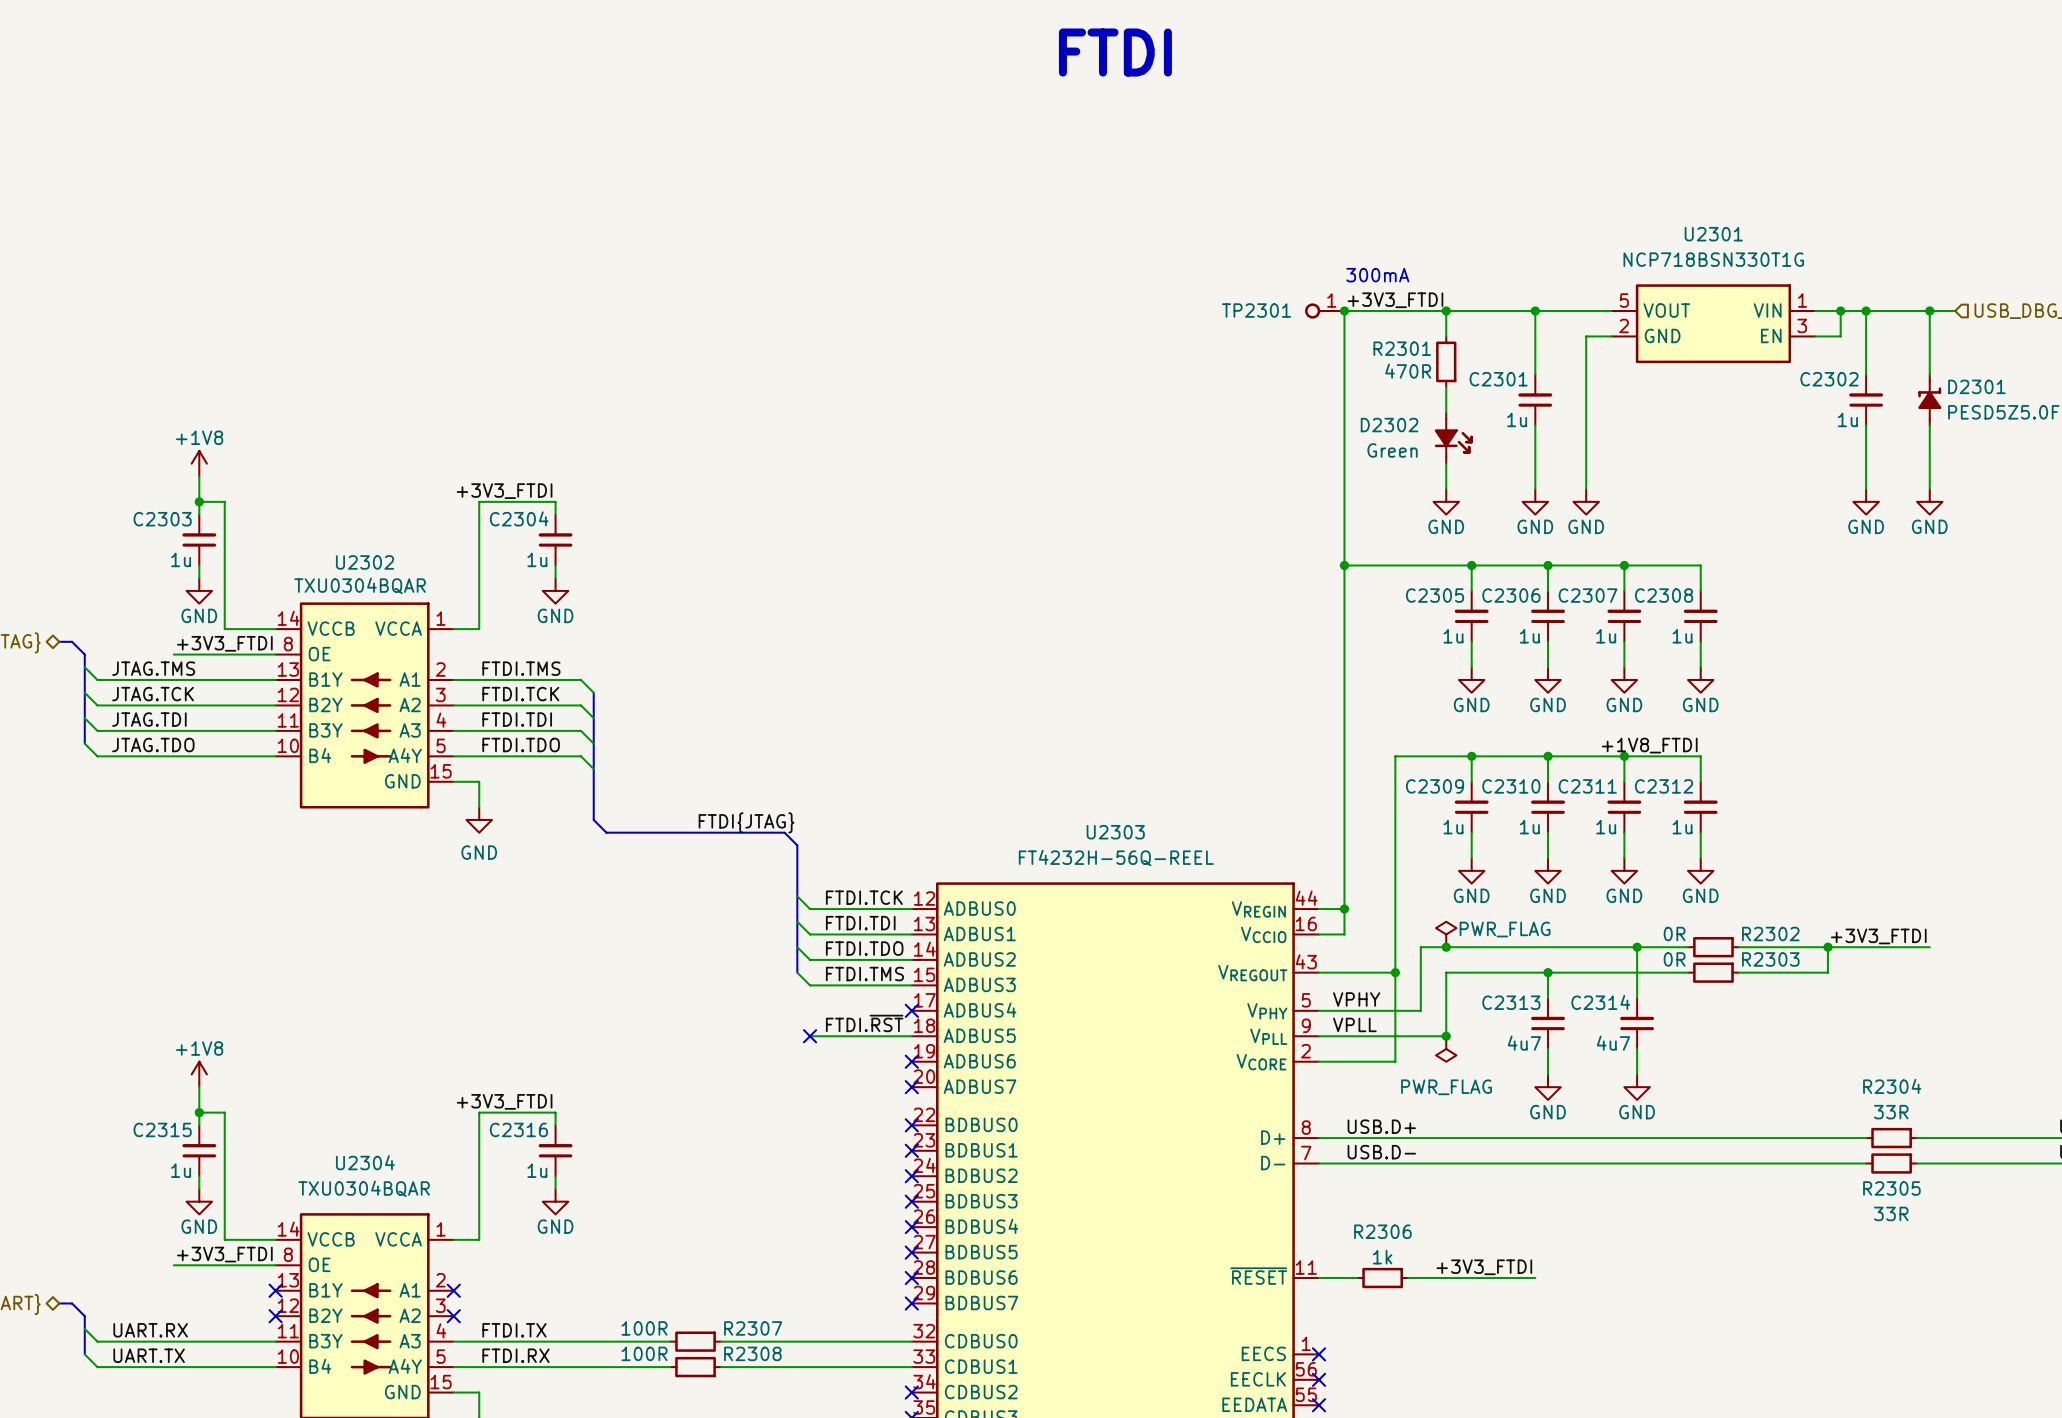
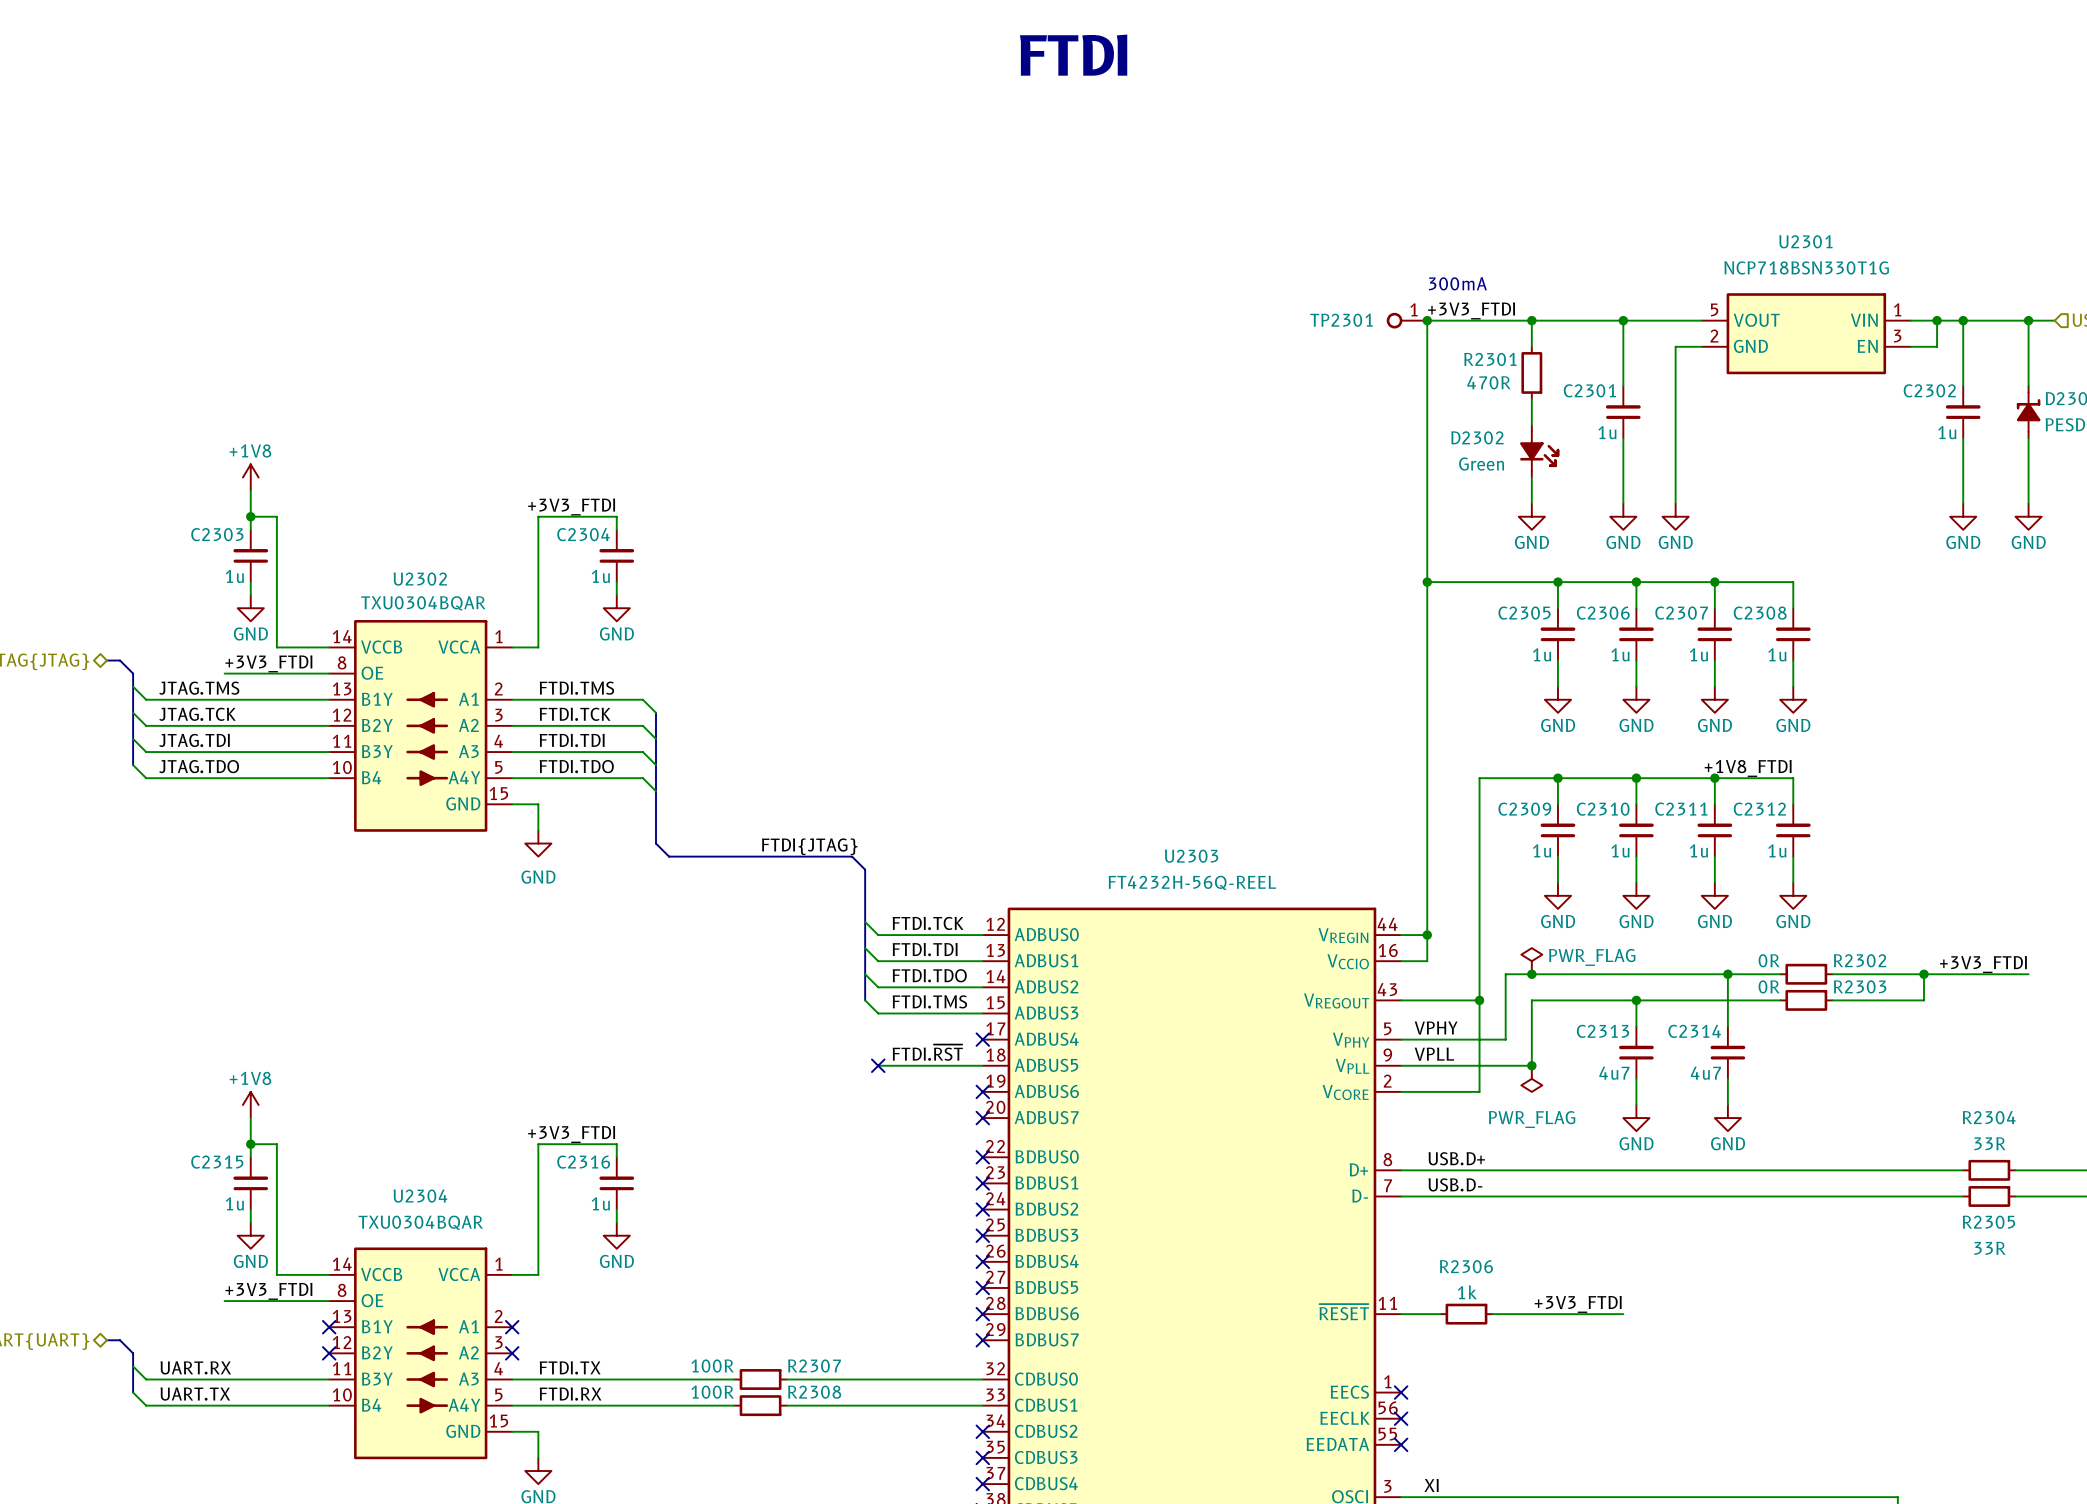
text position: FTDI (1115, 52) -> FTDI (1073, 55)

